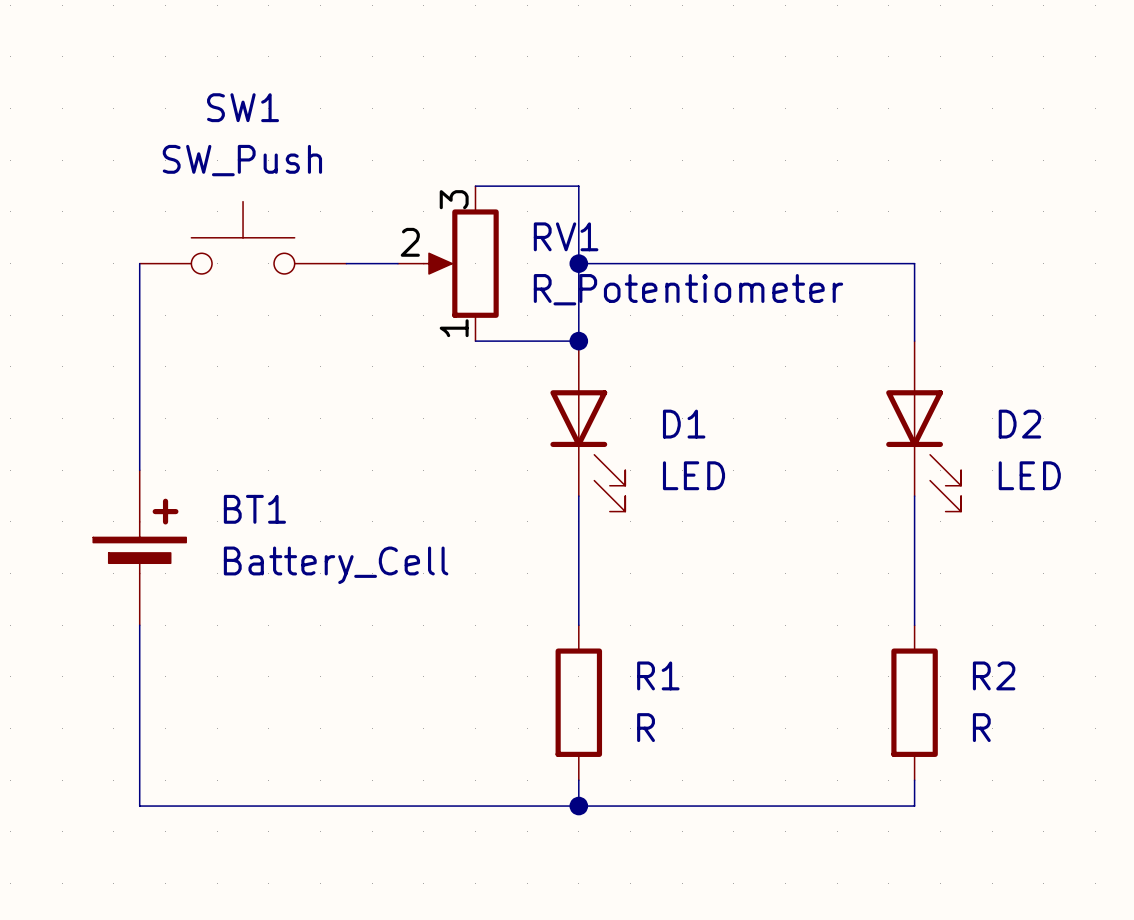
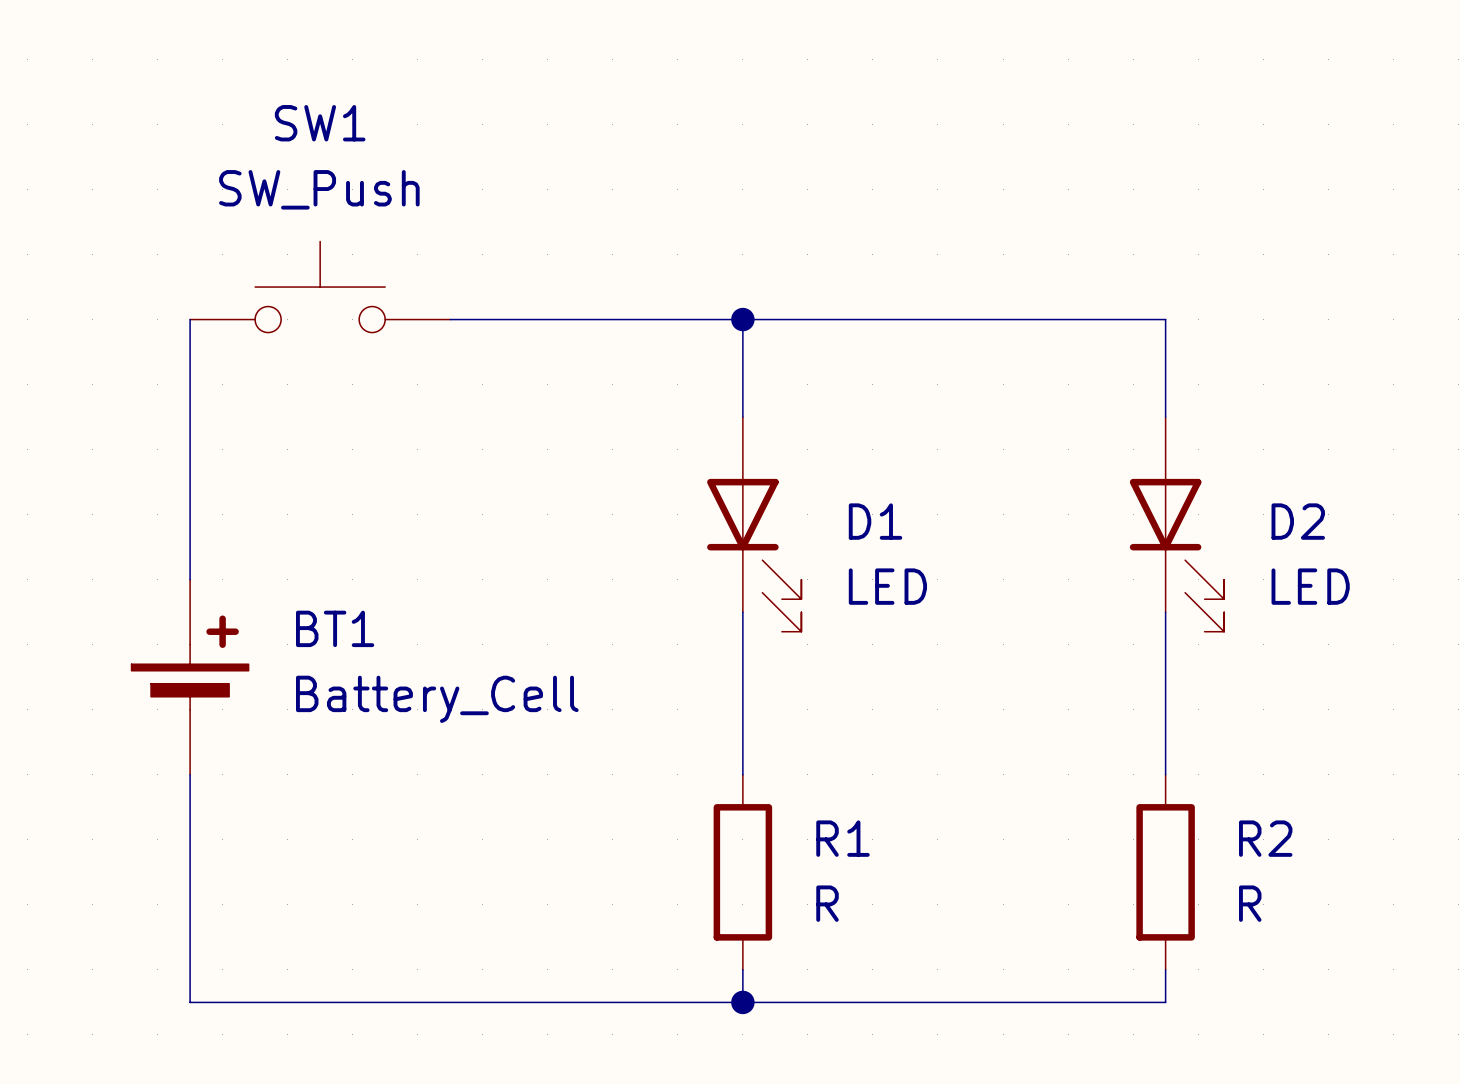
wire: (475, 186) (578, 186) (578, 263) -> (515, 319) (742, 319)
RV1: R_Potentiometer (448, 263) -> none
wire: (475, 341) (578, 341) -> none
junction: (578, 341) -> none

